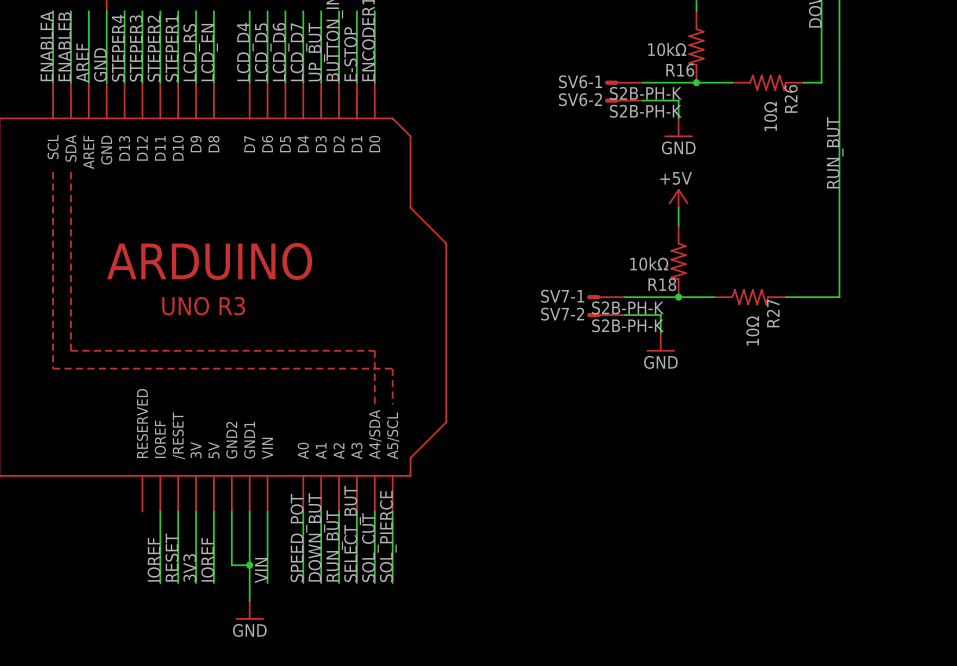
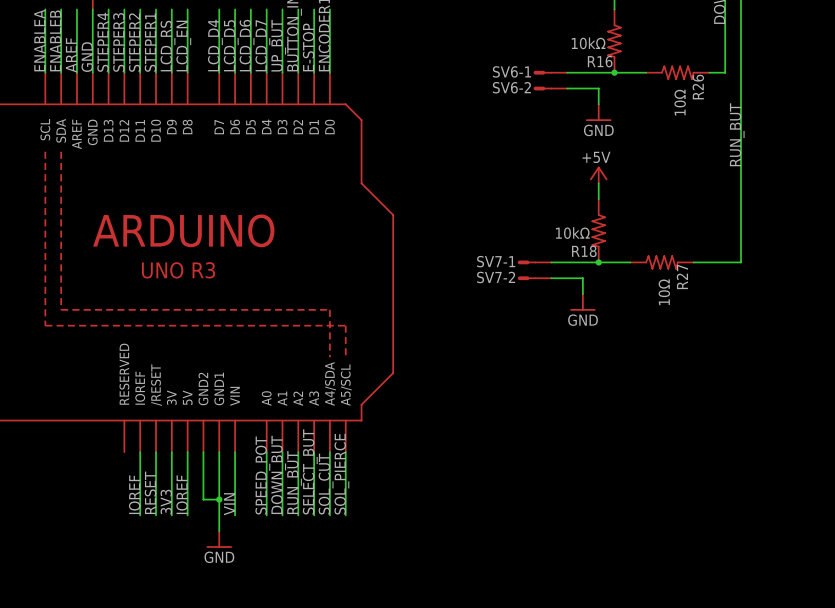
SV6-1 value: S2B-PH-K (645, 93) -> none
SV6-2 value: S2B-PH-K (645, 111) -> none
SV7-1 value: S2B-PH-K (627, 307) -> none
SV7-2 value: S2B-PH-K (627, 325) -> none

